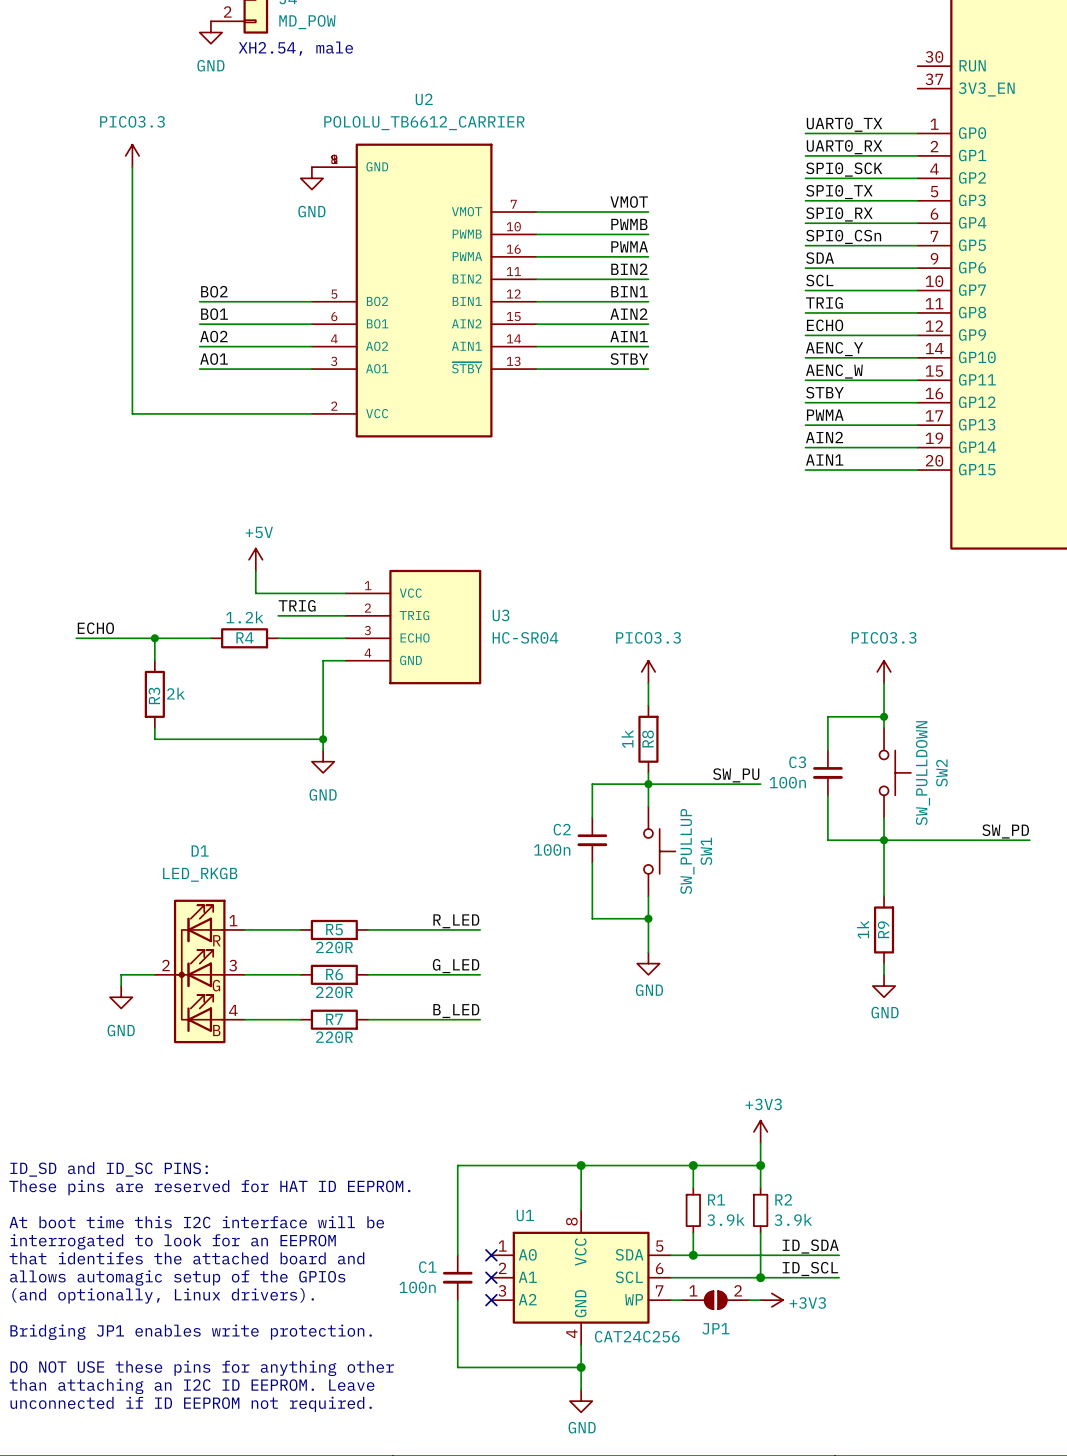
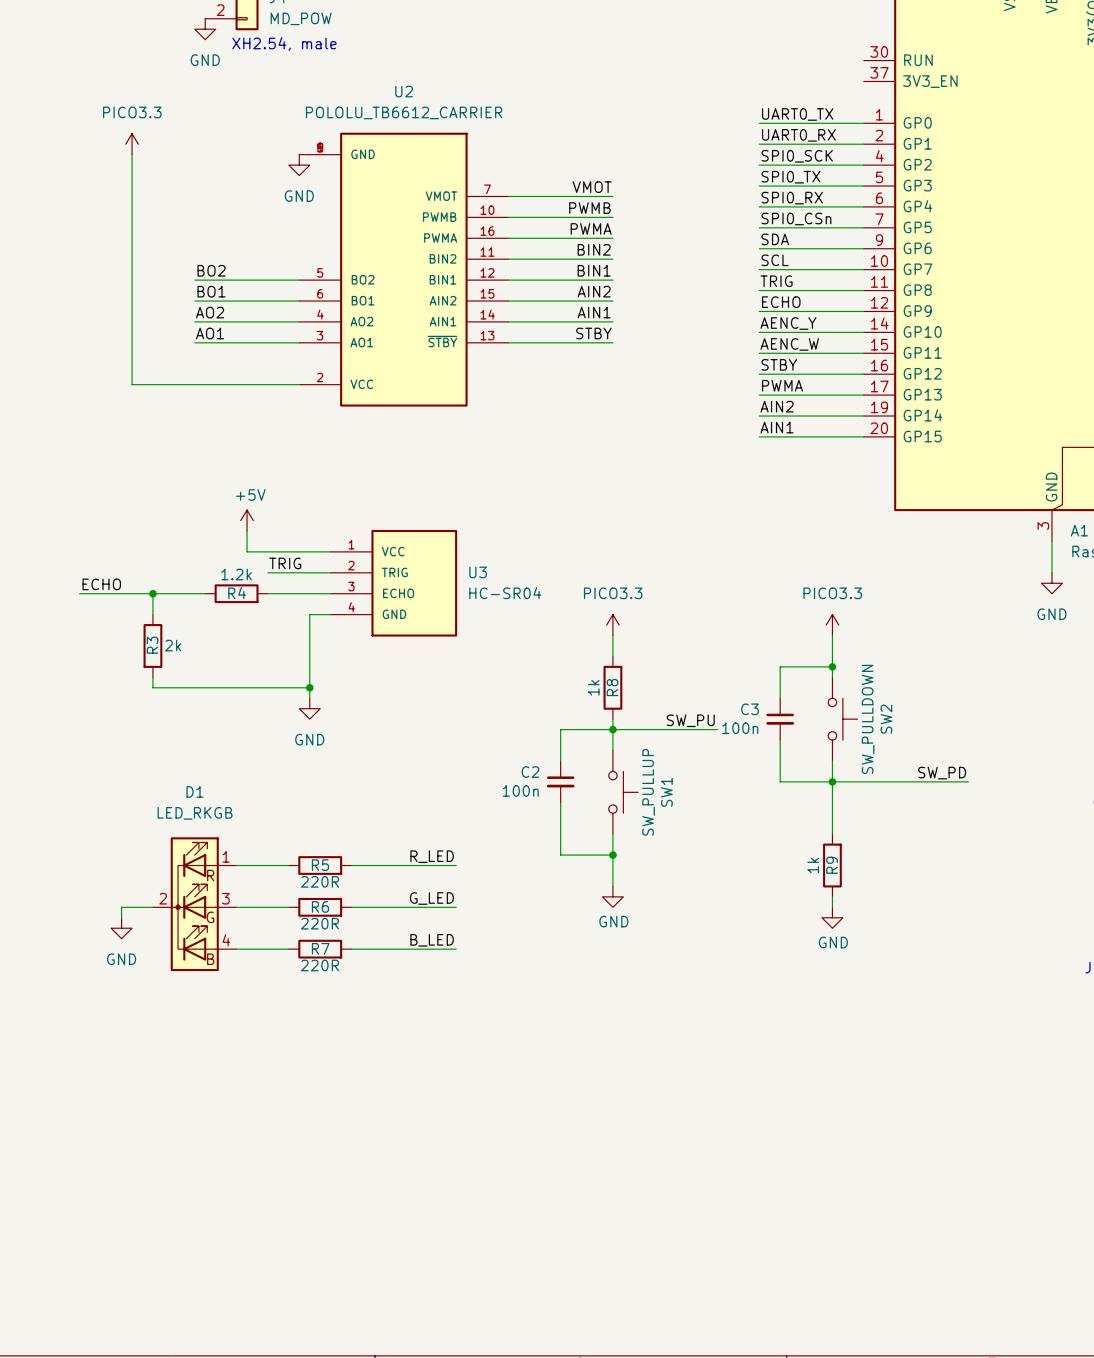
power symbol: +3V3 (760, 1131) -> none
wire: (760, 1143) (760, 1187) -> none
wire: (581, 1165) (581, 1210) -> none
junction: (581, 1165) -> none
wire: (693, 1165) (693, 1187) -> none
junction: (693, 1165) -> none
wire: (760, 1165) (457, 1165) (457, 1255) -> none
junction: (760, 1165) -> none
text: ID_SD and ID_SC PINS: (109, 1169) -> none
text: These pins are reserved for HAT ID EEPROM. (209, 1187) -> none
R1: 3.9k (693, 1210) -> none
R2: 3.9k (760, 1210) -> none
text: At boot time this I2C interface will be (196, 1222) -> none
wire: (693, 1232) (693, 1255) -> none
wire: (760, 1232) (760, 1277) -> none
text: interrogated to look for an EEPROM (173, 1241) -> none
label: ID_SDA (810, 1246) -> none
no-connect mark: (491, 1255) -> none
wire: (670, 1255) (839, 1255) -> none
junction: (693, 1255) -> none
text: that identifes the attached board and (186, 1258) -> none
label: ID_SCL (810, 1268) -> none
C1: 100n (457, 1277) -> none
no-connect mark: (491, 1277) -> none
U1: CAT24C256 (581, 1277) -> none
wire: (670, 1277) (839, 1277) -> none
junction: (760, 1277) -> none
text: allows automagic setup of the GPIOs (177, 1278) -> none
text: (and optionally, Linux drivers). (163, 1295) -> none
wire: (457, 1300) (457, 1367) (581, 1367) -> none
no-connect mark: (491, 1300) -> none
wire: (670, 1300) (682, 1300) -> none
JP1: (715, 1300) -> none
wire: (749, 1300) (760, 1300) -> none
power symbol: +3V3 (771, 1300) -> none
text: Bridging JP1 enables write protection. (191, 1332) -> none
wire: (581, 1345) (581, 1389) -> none
junction: (581, 1367) -> none
text: DO NOT USE these pins for anything other (202, 1368) -> none
text: than attaching an I2C ID EEPROM. Leave (192, 1386) -> none
power symbol: GND (581, 1401) -> none
text: unconnected if ID EEPROM not required. (191, 1404) -> none

